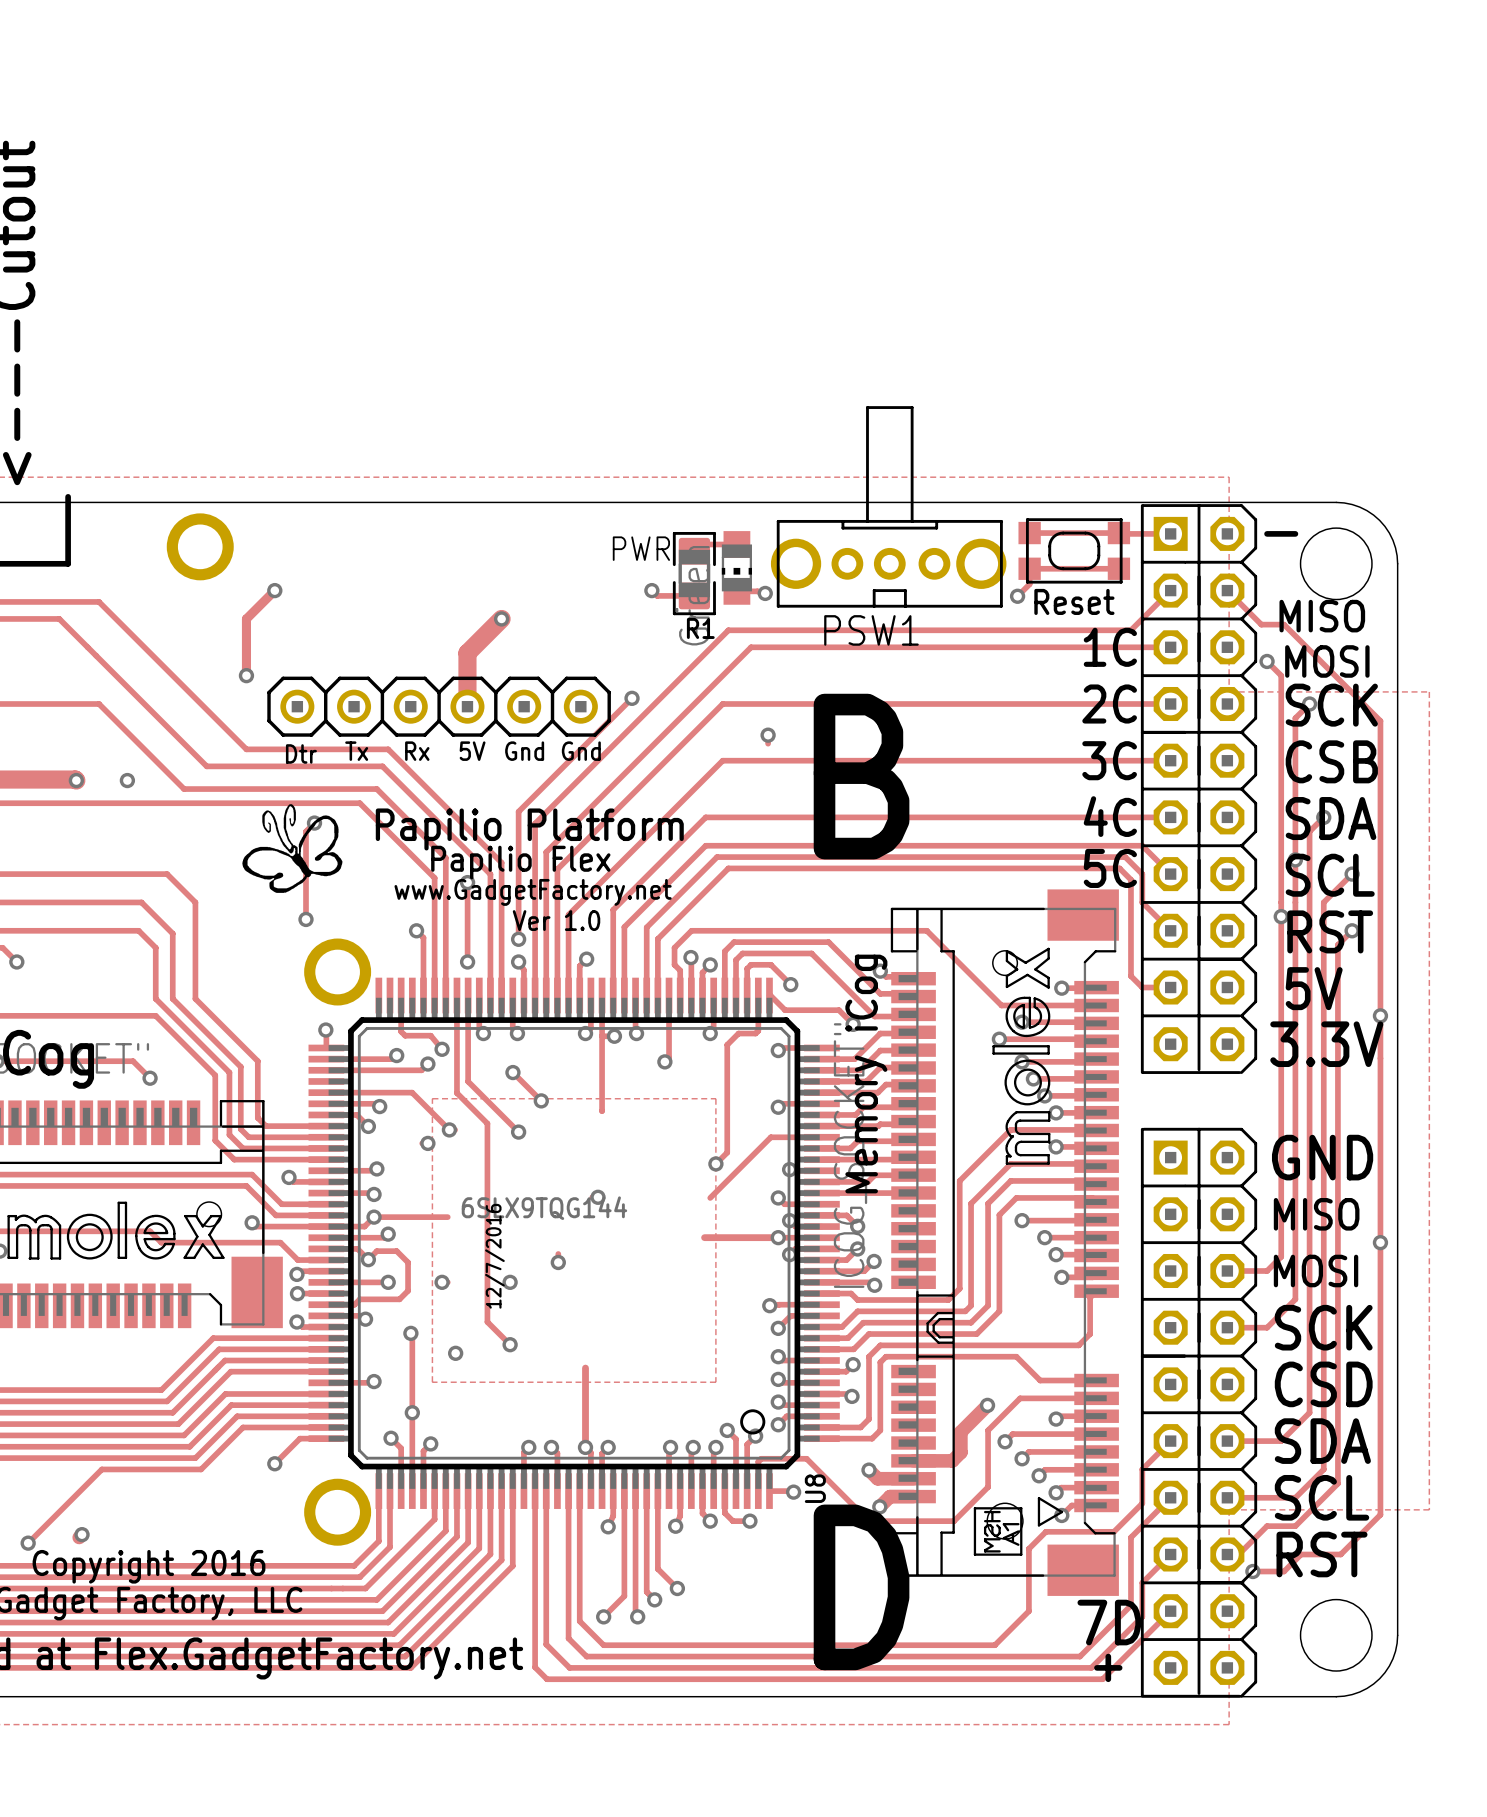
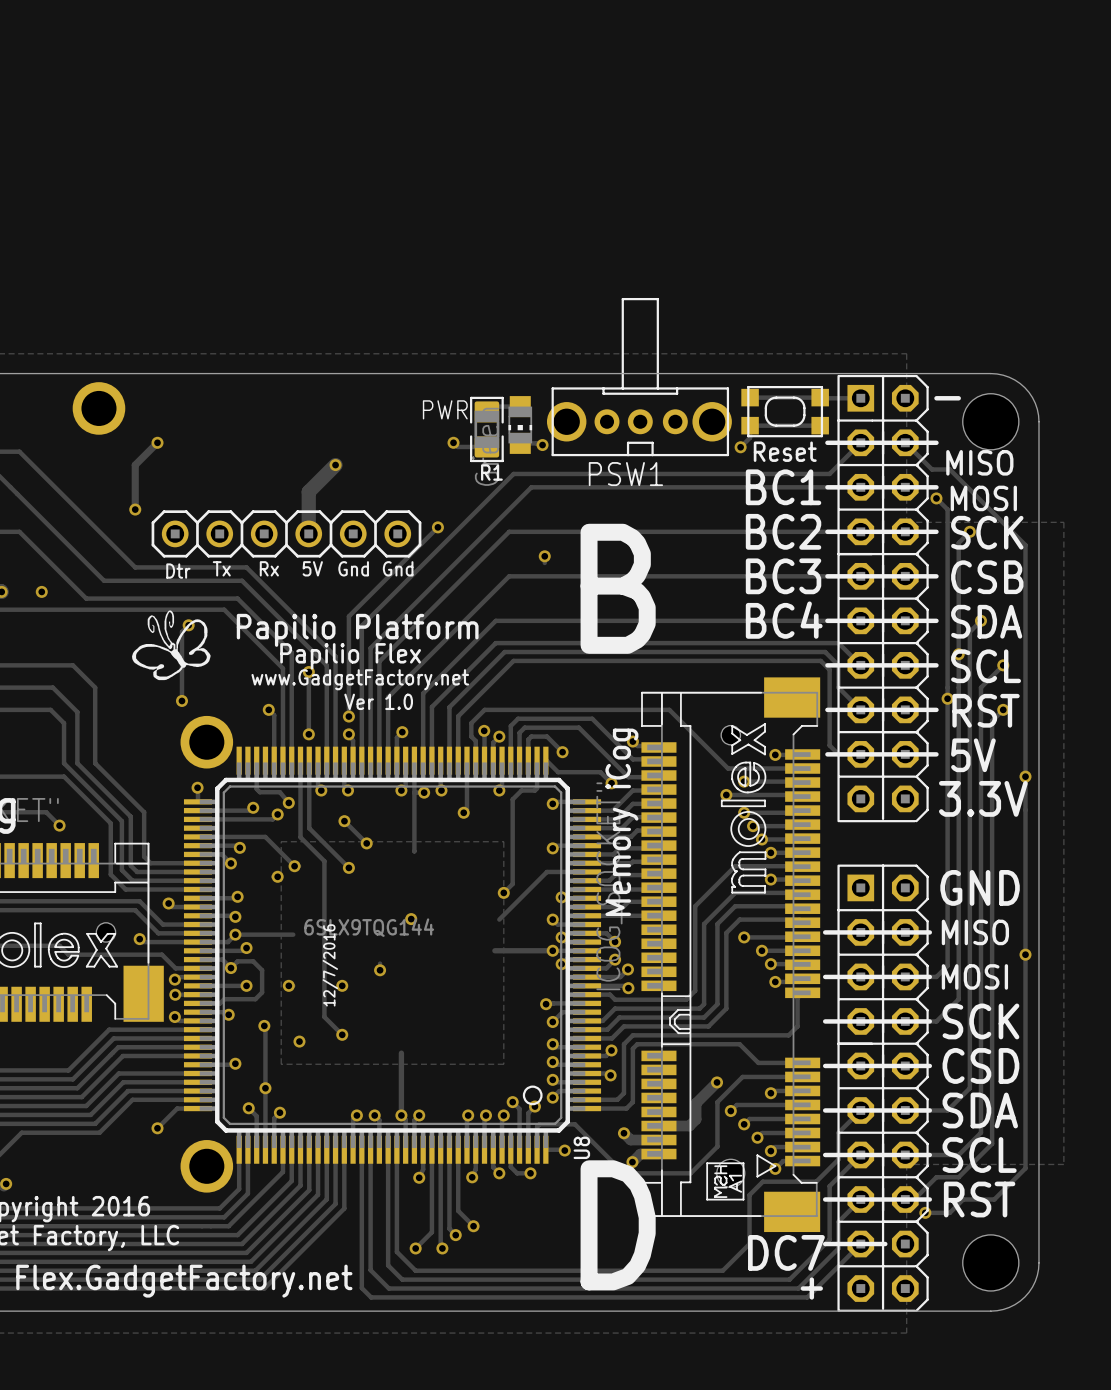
line: none -> (827, 442) (936, 442)
text: none -> BC1 (783, 487)
text: 1C (1110, 647) -> none
line: none -> (827, 487) (936, 487)
text: none -> BC2 (783, 531)
text: 2C (1109, 704) -> none
line: none -> (827, 531) (936, 531)
text: none -> BC3 (783, 576)
text: 3C (1109, 760) -> none
line: none -> (827, 576) (936, 576)
text: none -> BC4 (784, 620)
text: 4C (1110, 816) -> none
line: none -> (827, 620) (936, 620)
text: 5C (1110, 868) -> none
line: none -> (827, 665) (936, 665)
line: none -> (827, 709) (936, 709)
line: none -> (827, 754) (936, 754)
line: none -> (825, 932) (929, 932)
line: none -> (825, 976) (929, 976)
line: none -> (825, 1021) (929, 1021)
line: none -> (825, 1065) (929, 1065)
line: none -> (825, 1110) (929, 1110)
line: none -> (825, 1154) (929, 1154)
line: none -> (825, 1199) (929, 1199)
line: none -> (825, 1244) (885, 1244)
text: none -> DC7 (786, 1252)
text: 7D (1109, 1622) -> none

